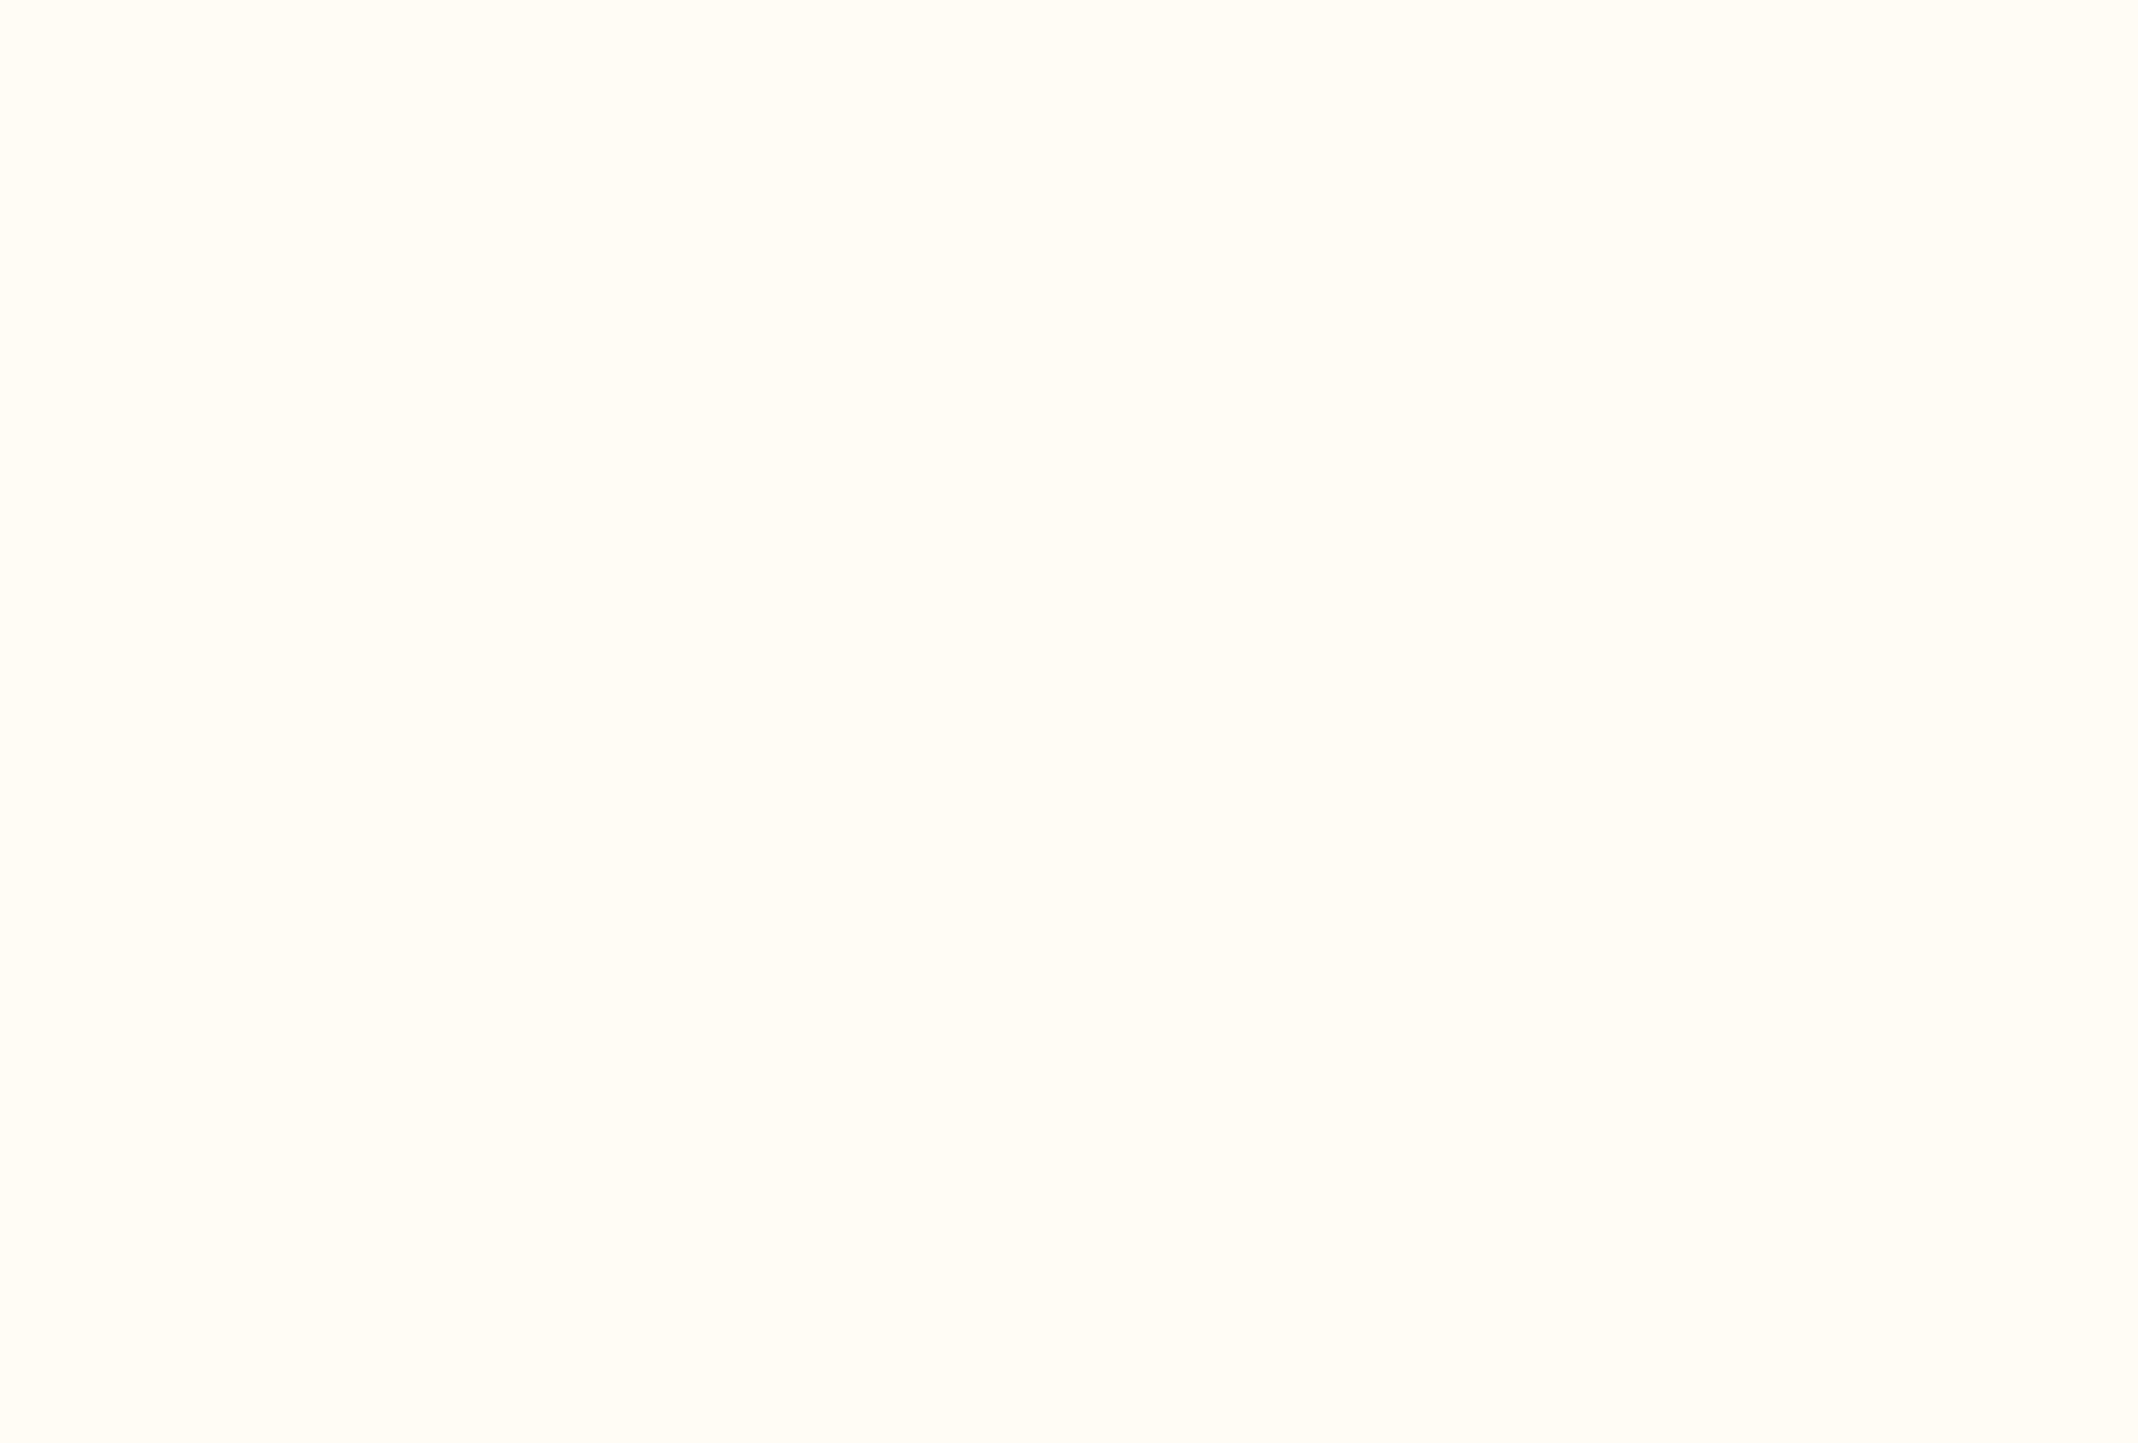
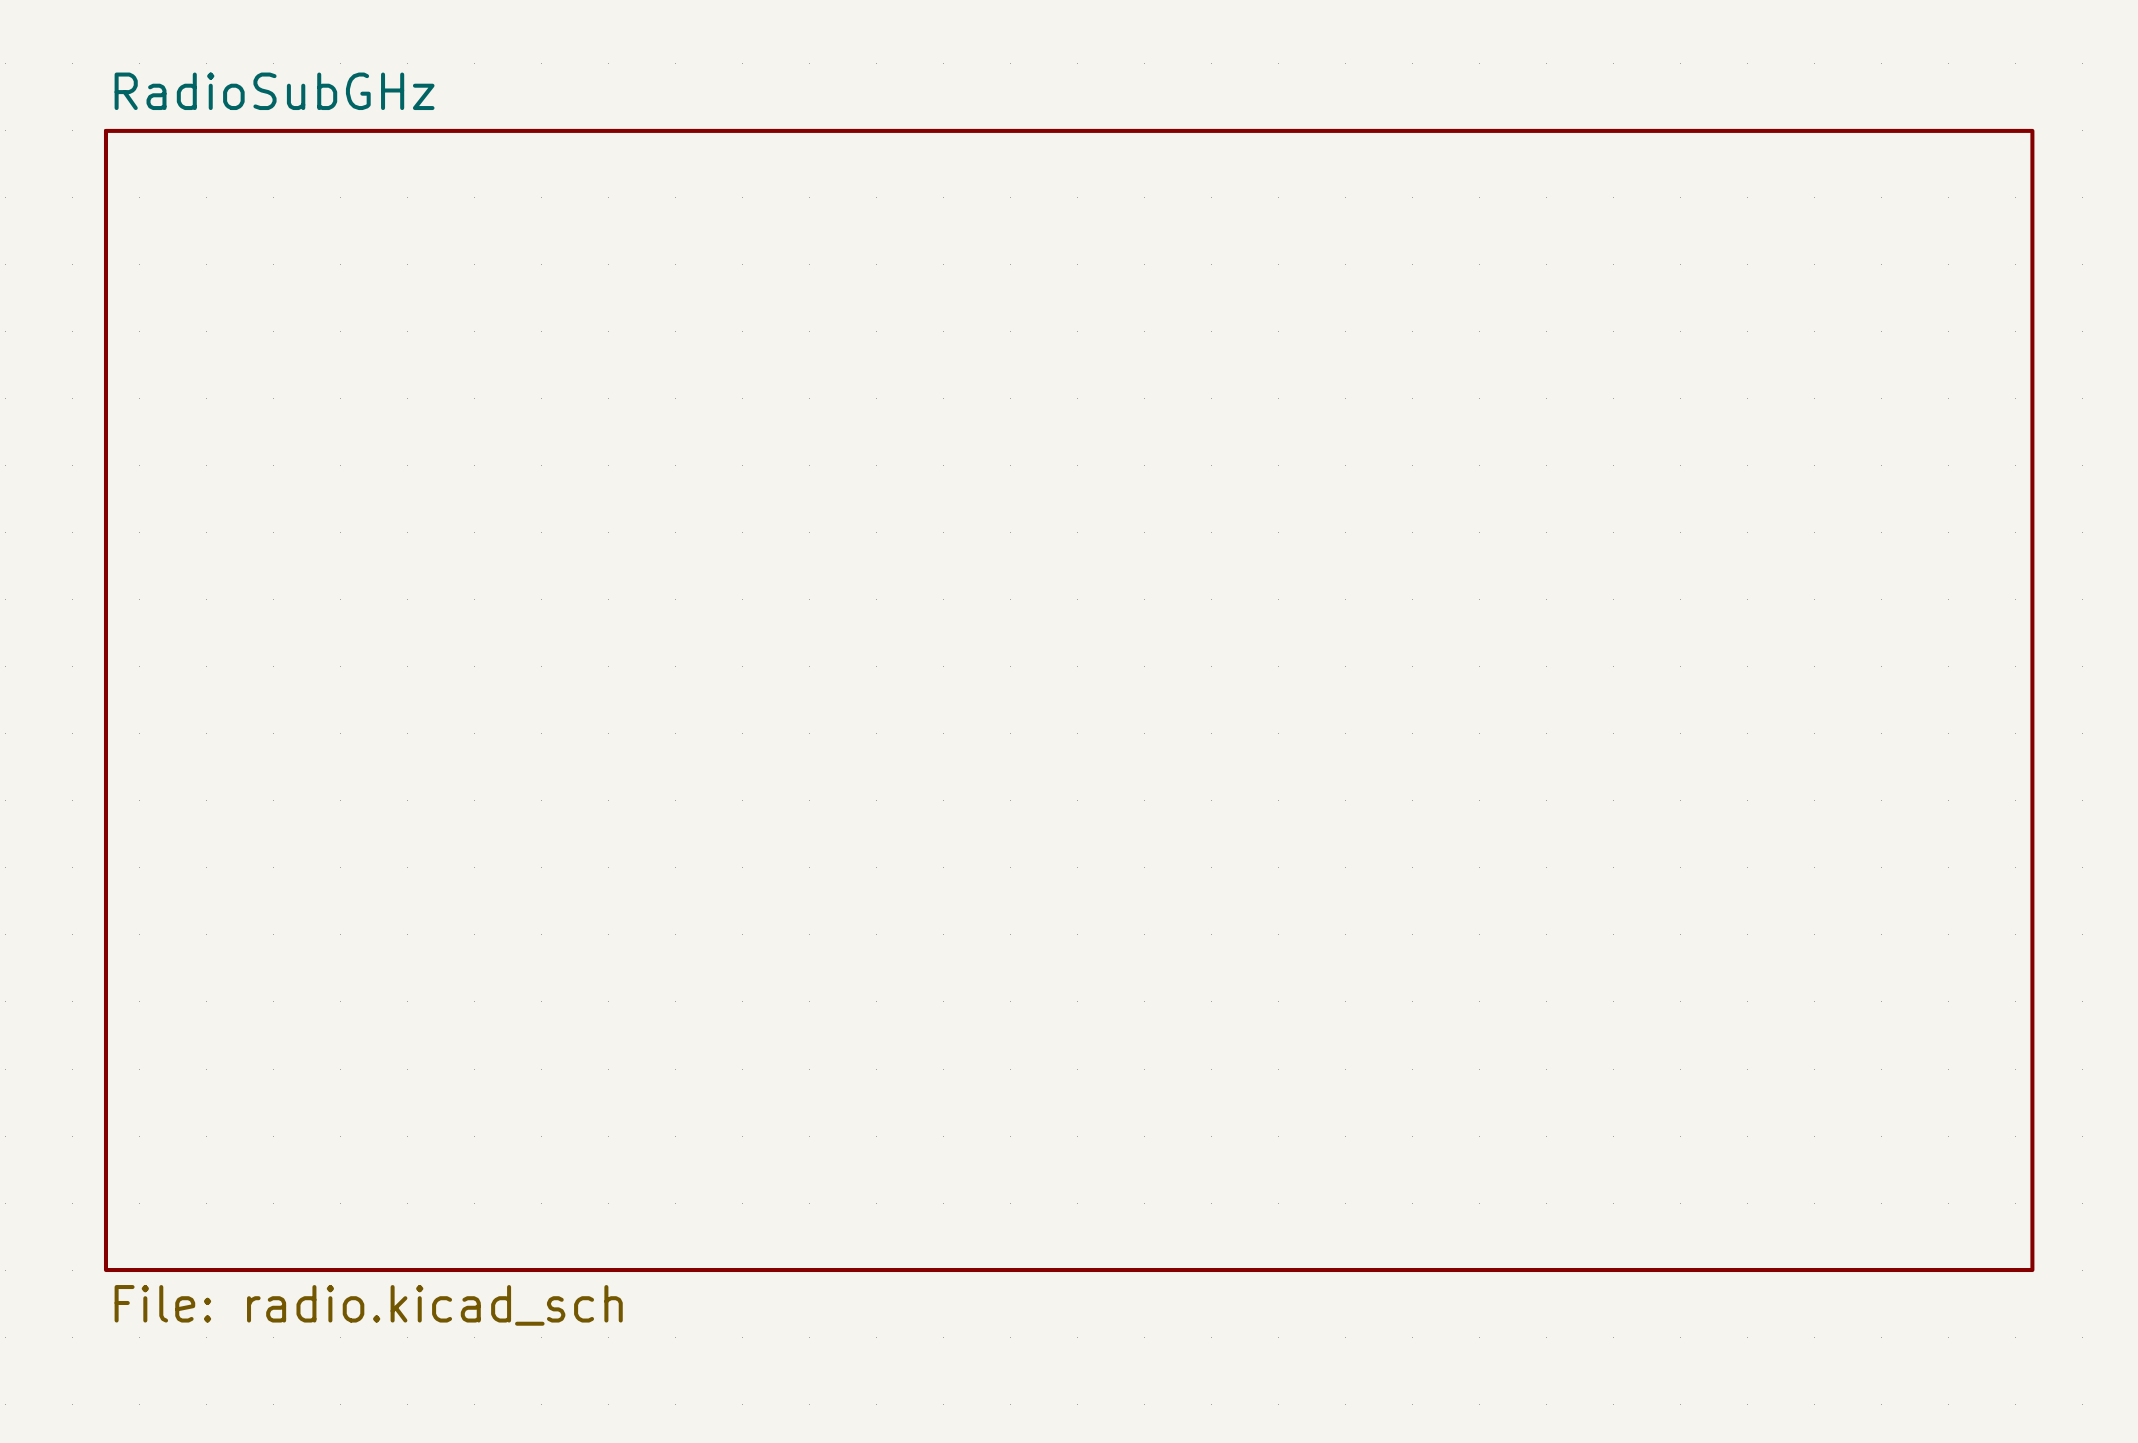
sheet RadioSubGHz: none -> File: radio.kicad_sch (1069, 700)

